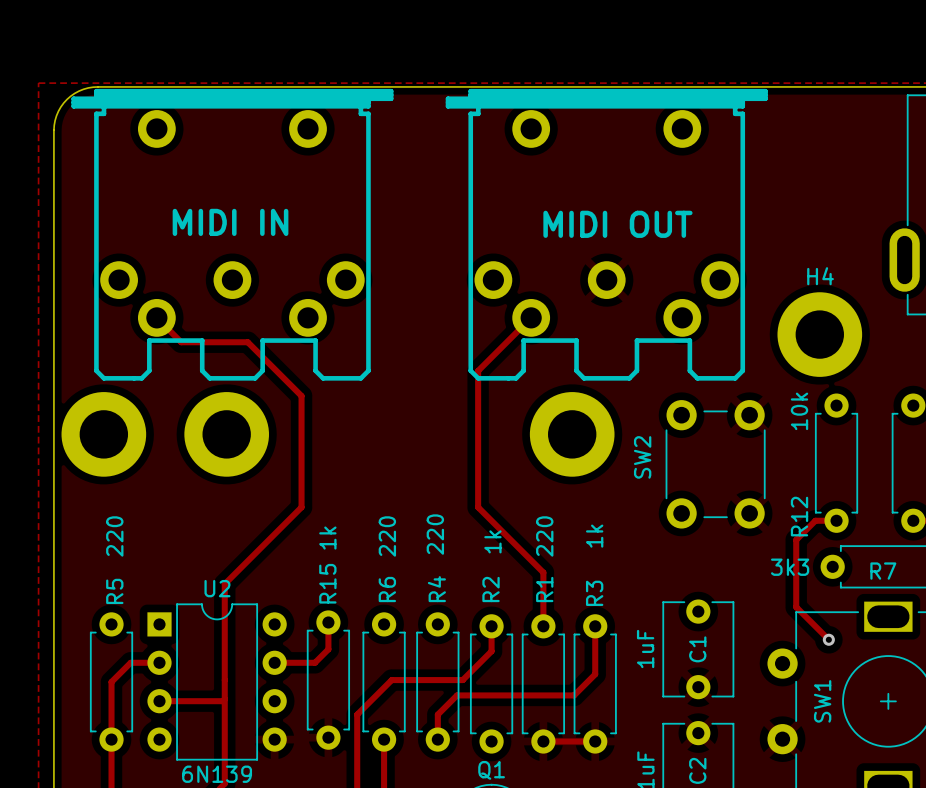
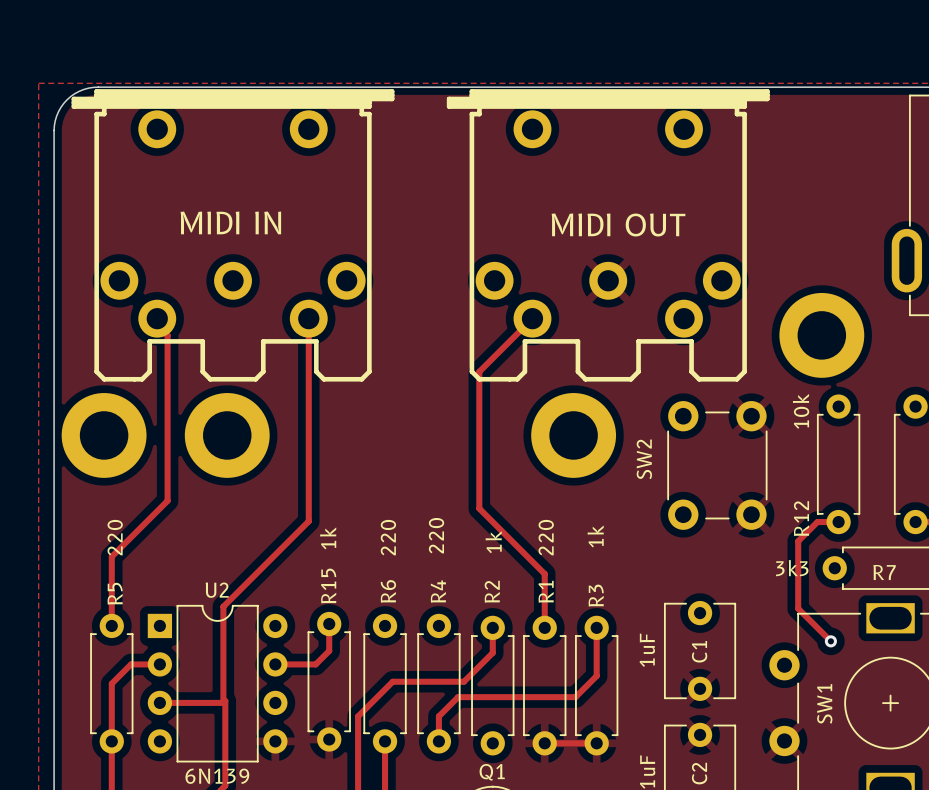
H4 name: H4 (820, 276) -> none
track: (156, 317) (181, 342) (247, 342) (301, 395) (301, 507) (224, 584) (224, 699) -> (157, 318) (157, 325) (167, 335) (167, 500) (111, 556) (111, 625)
track: none -> (308, 318) (308, 521) (223, 606) (223, 702)

